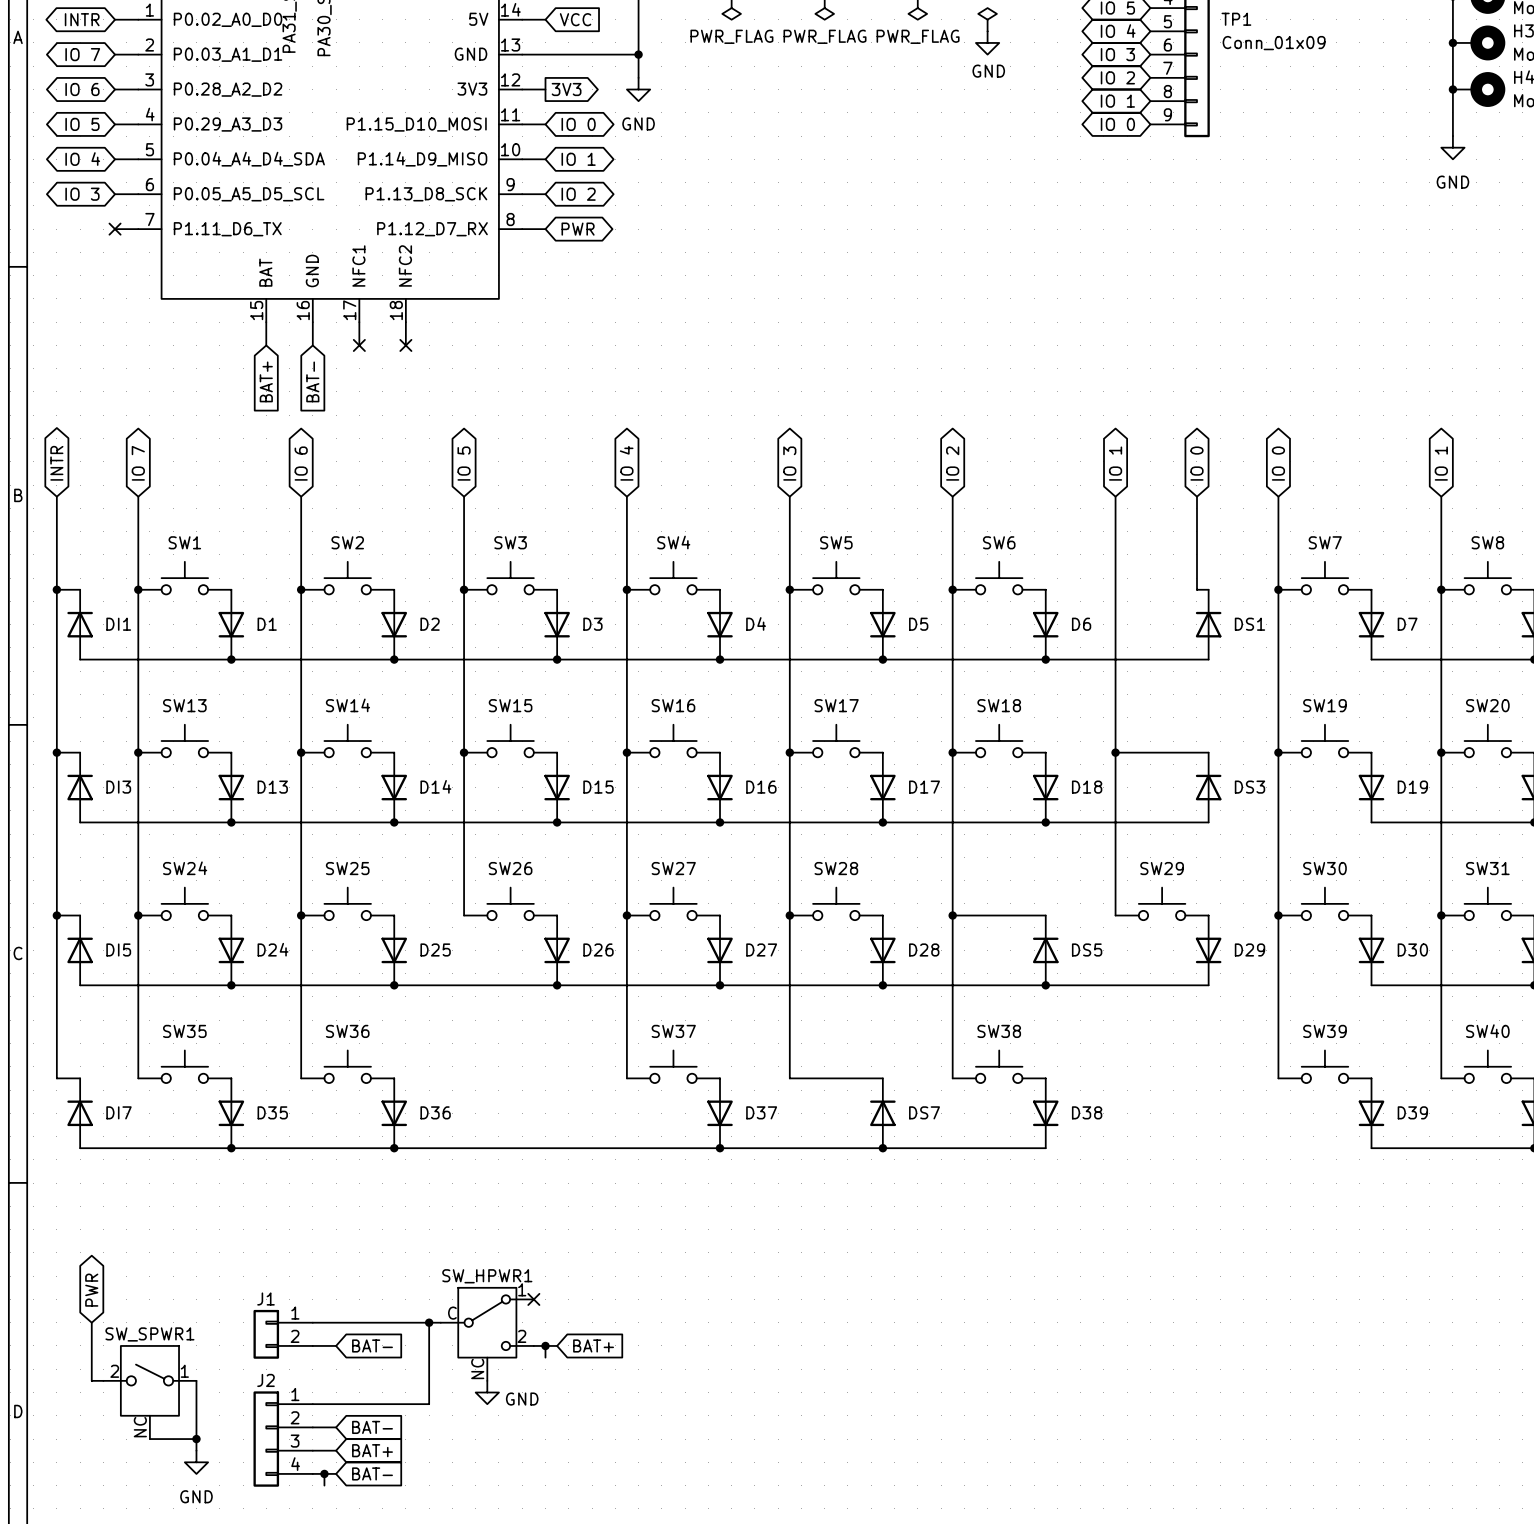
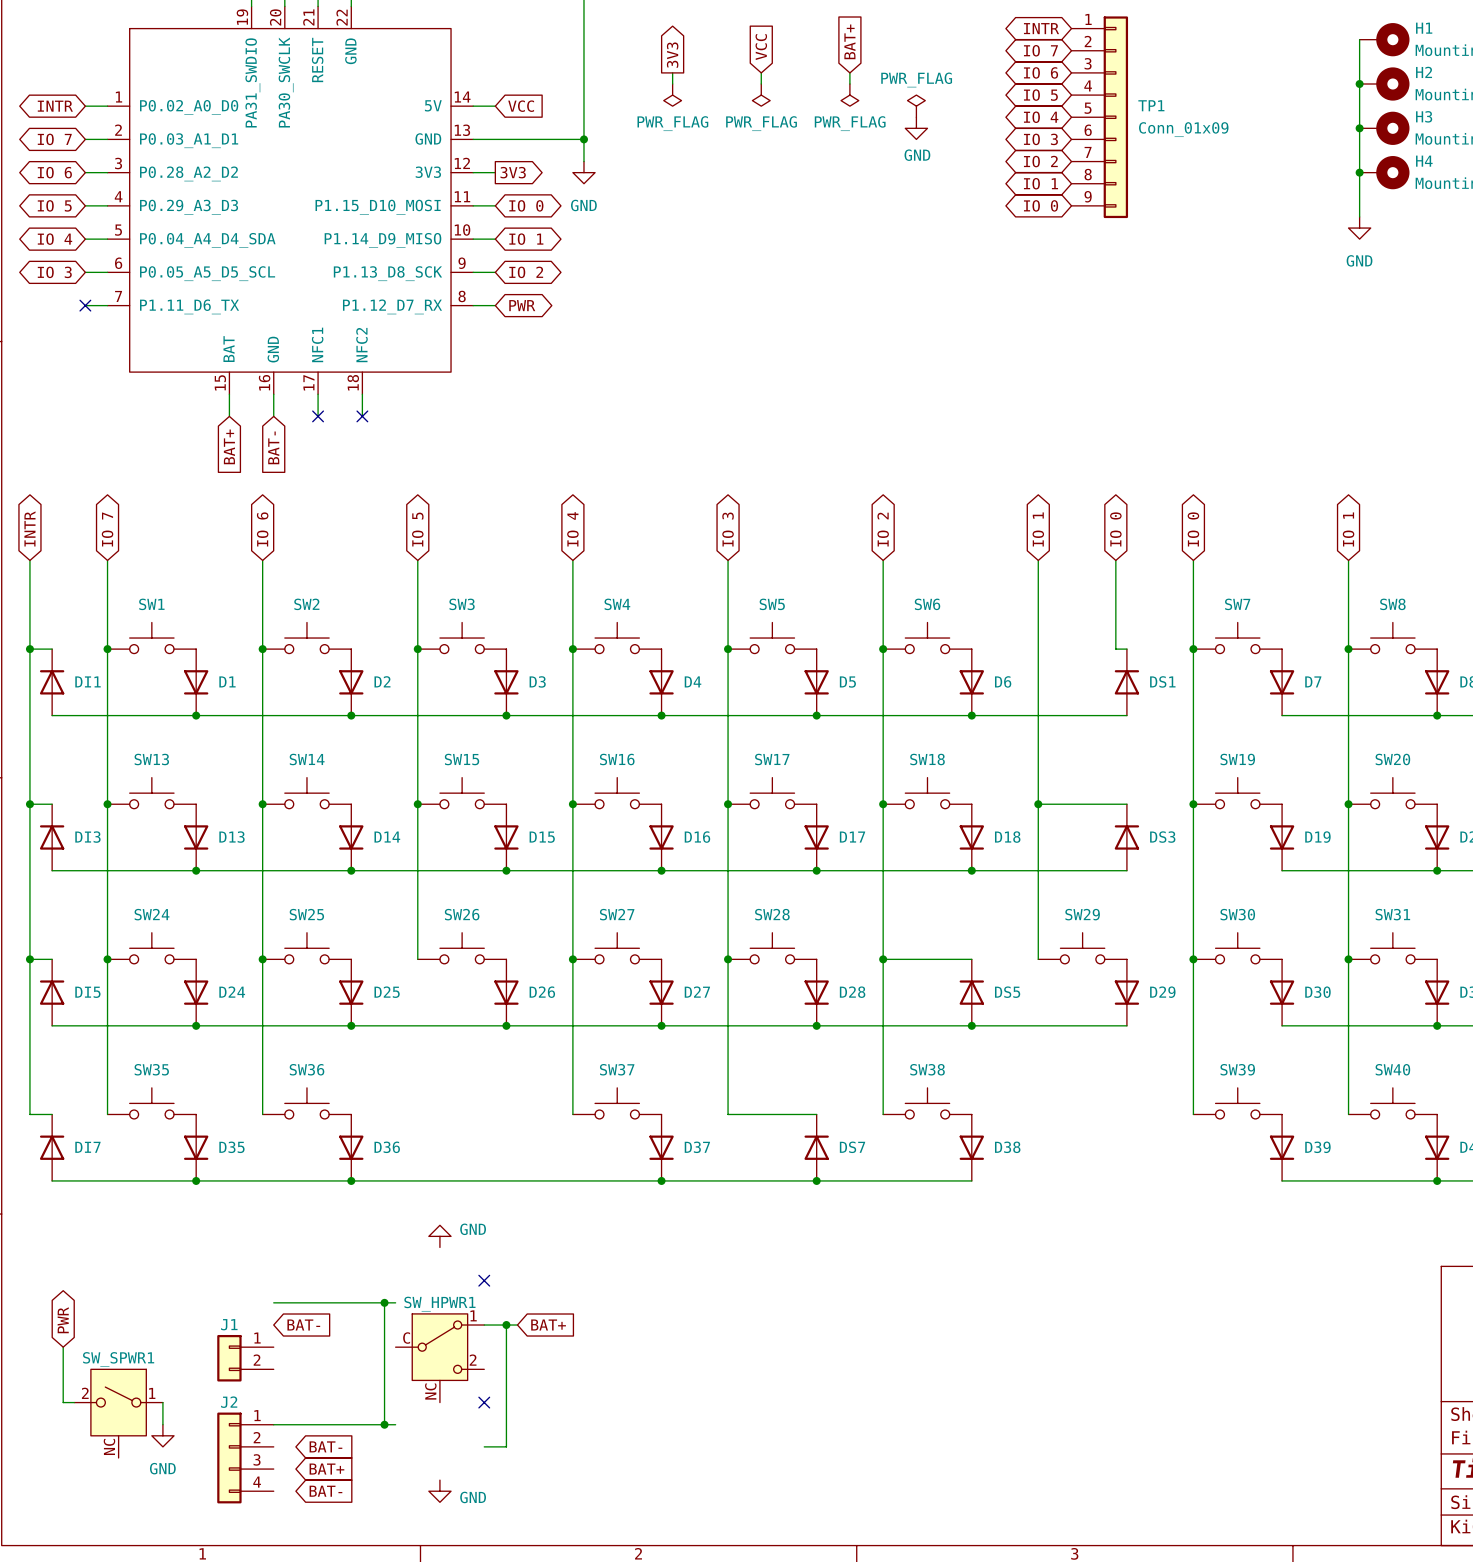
power symbol: none -> GND (439, 1236)
no-connect mark: none -> (484, 1280)
wire: none -> (384, 1302) (384, 1347)
junction: none -> (384, 1302)
wire: none -> (484, 1325) (517, 1325)
no-connect mark: (533, 1299) -> none
wire: none -> (506, 1325) (506, 1446) (484, 1446)
wire: (312, 1322) (440, 1322) -> (273, 1302) (395, 1302)
junction: (429, 1322) -> none
wire: (312, 1345) (336, 1345) -> none
global label position: BAT- (372, 1345) -> BAT- (303, 1325)
wire: (533, 1345) (557, 1345) -> none
wire: (545, 1345) (545, 1357) -> none
junction position: (545, 1345) -> (506, 1325)
global label position: BAT+ (593, 1345) -> BAT+ (548, 1325)
no-connect mark: none -> (484, 1402)
power symbol position: GND (487, 1392) -> GND (439, 1491)
wire: (196, 1404) (196, 1450) -> none
wire: none -> (384, 1424) (395, 1424)
junction: none -> (384, 1424)
wire: (312, 1427) (336, 1427) -> none
wire: (149, 1439) (196, 1439) -> none
junction: (196, 1439) -> none
wire: (312, 1450) (336, 1450) -> none
power symbol position: GND (196, 1462) -> GND (162, 1435)
wire: (312, 1473) (336, 1473) -> none
wire: (324, 1473) (324, 1485) -> none
junction: (324, 1473) -> none

